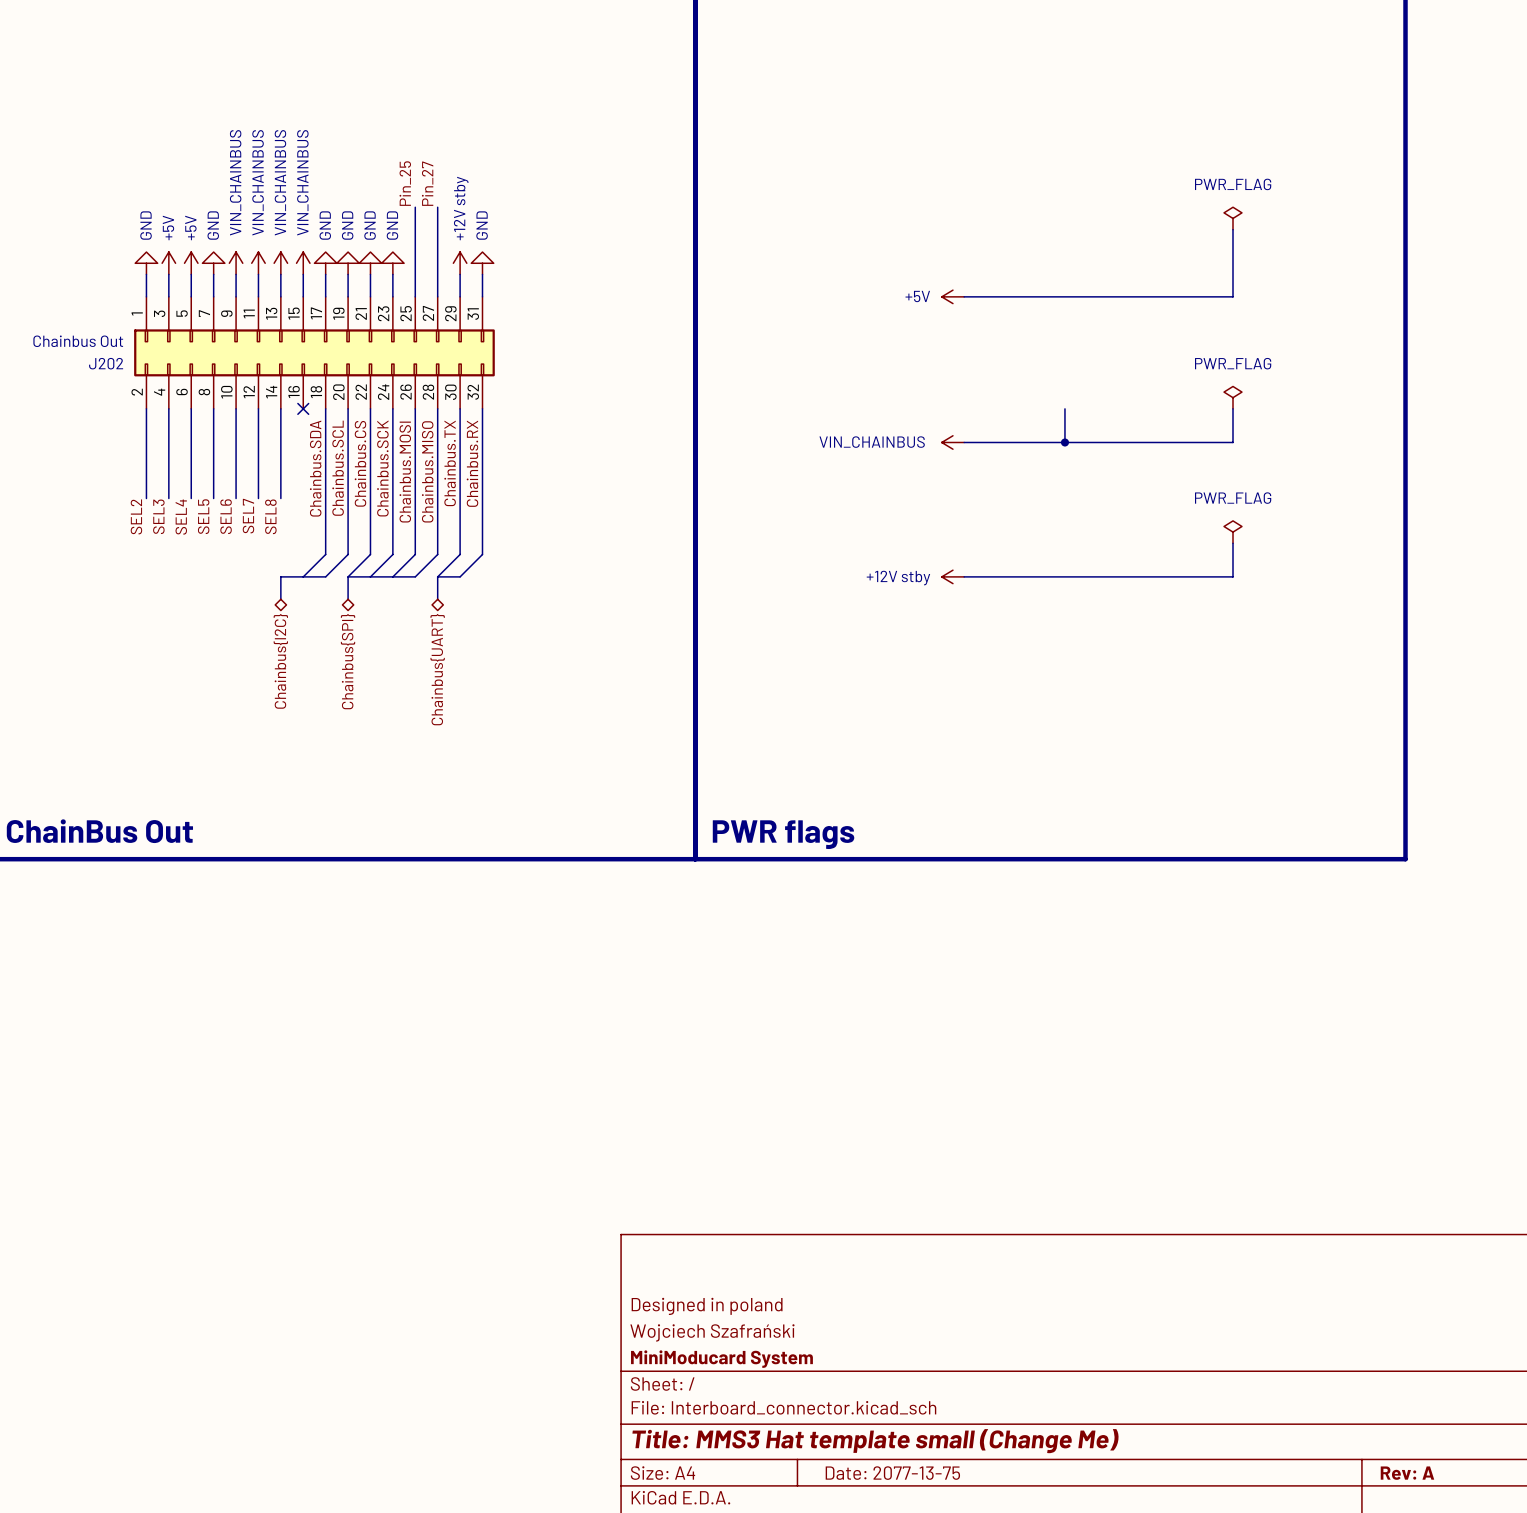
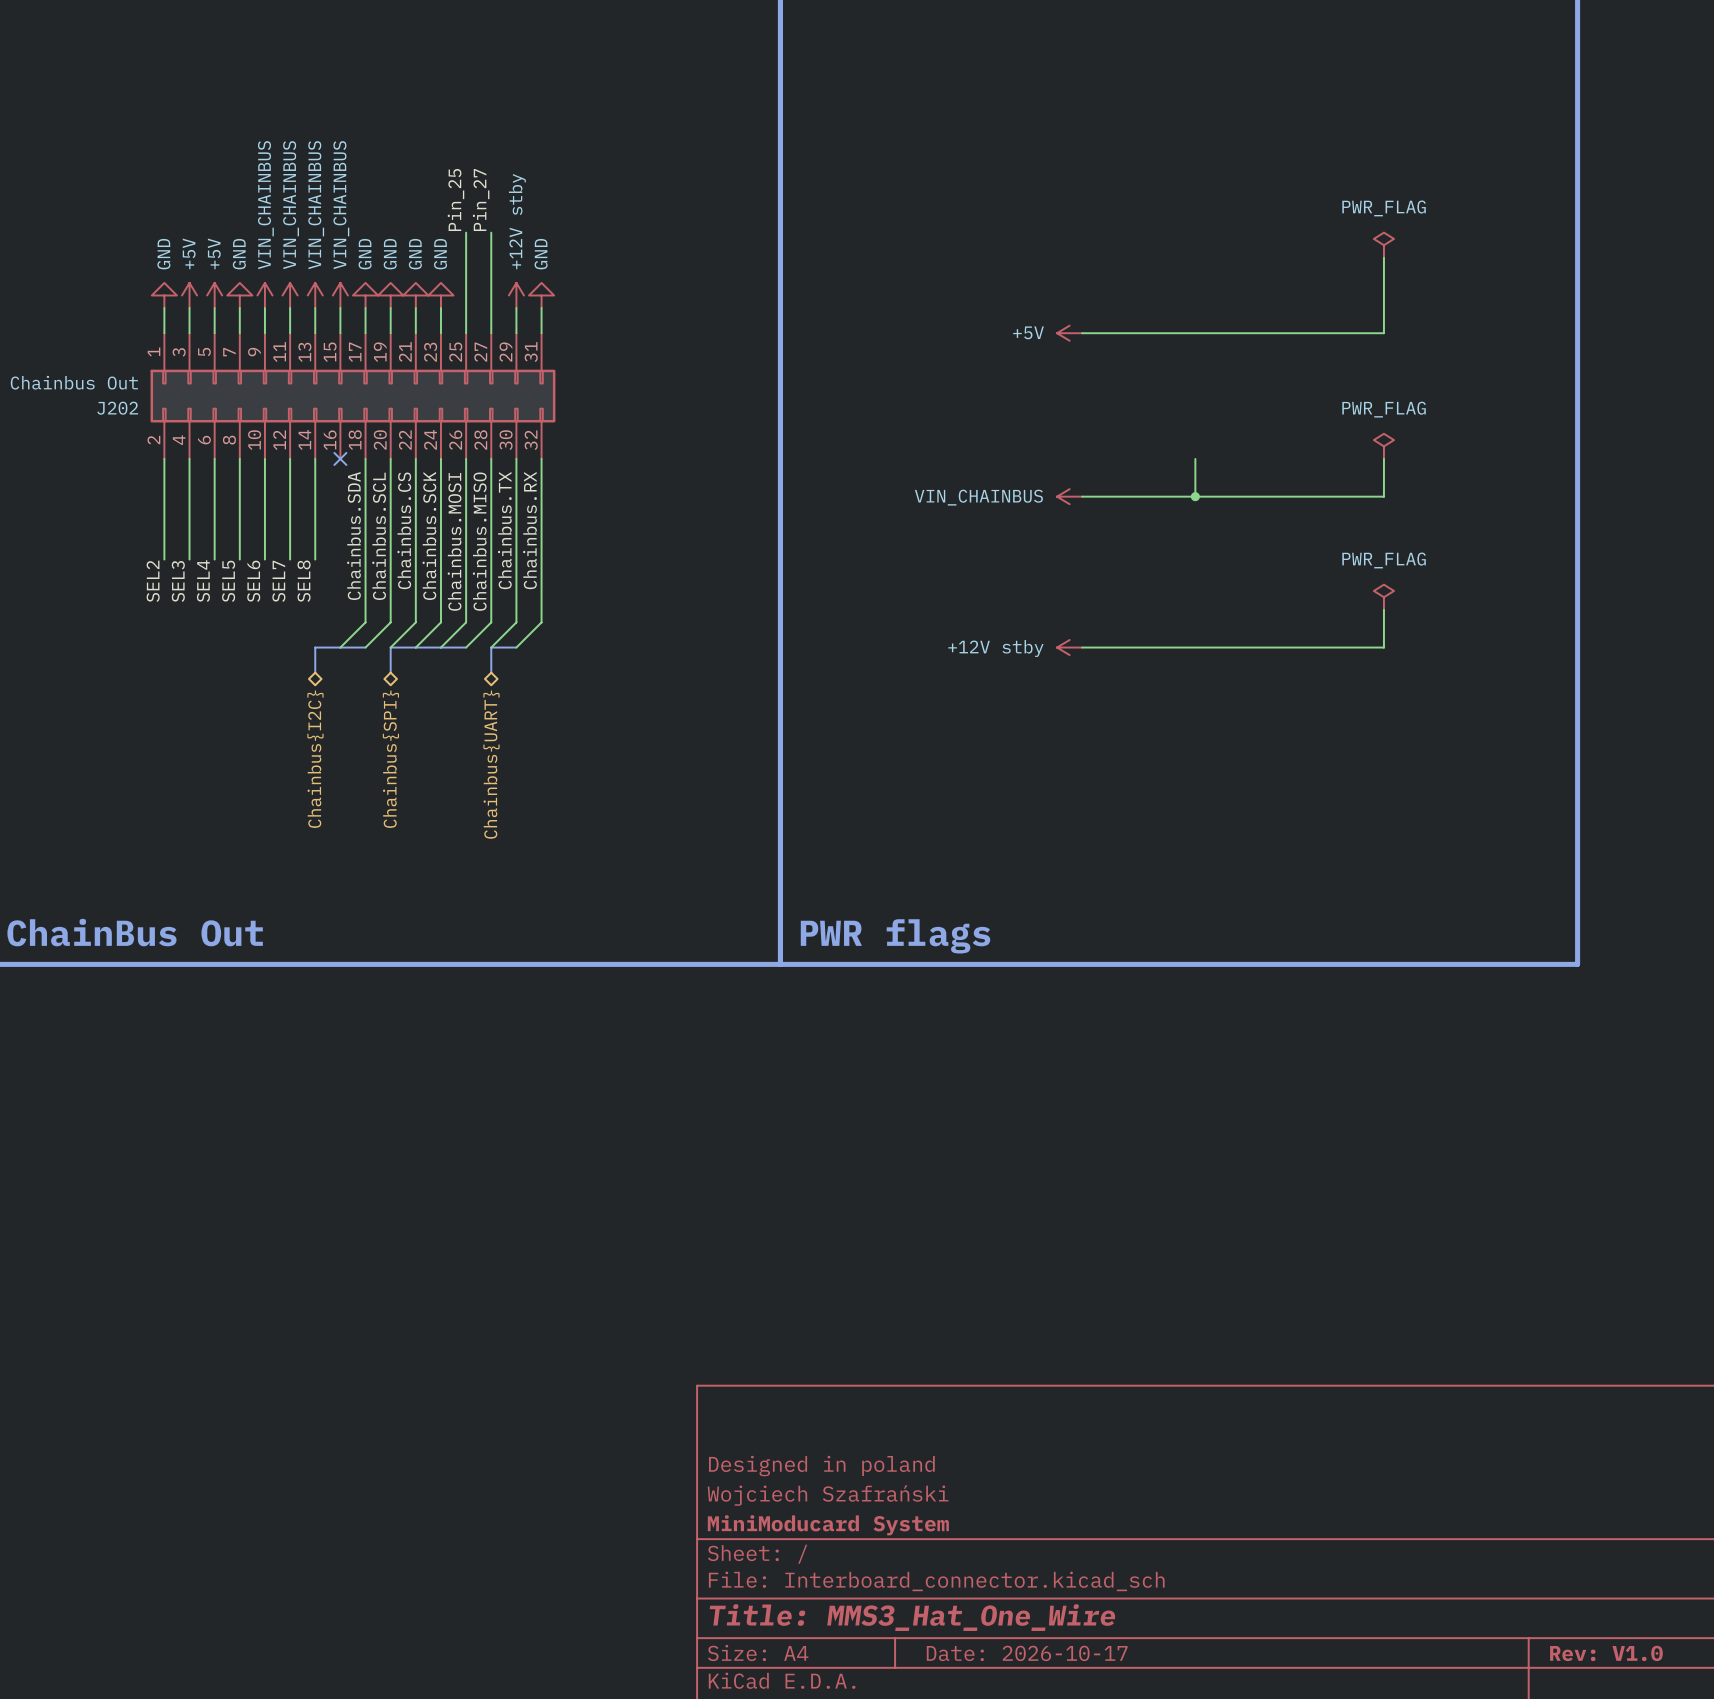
title block: Title: MMS3 Hat template small (Change Me) (875, 1441) -> Title: MMS3_Hat_One_Wire (912, 1617)
title block: Date: 2077-13-75 (892, 1473) -> Date: 2026-10-17 (1027, 1653)
title block: Rev: A (1407, 1473) -> Rev: V1.0 (1606, 1653)

